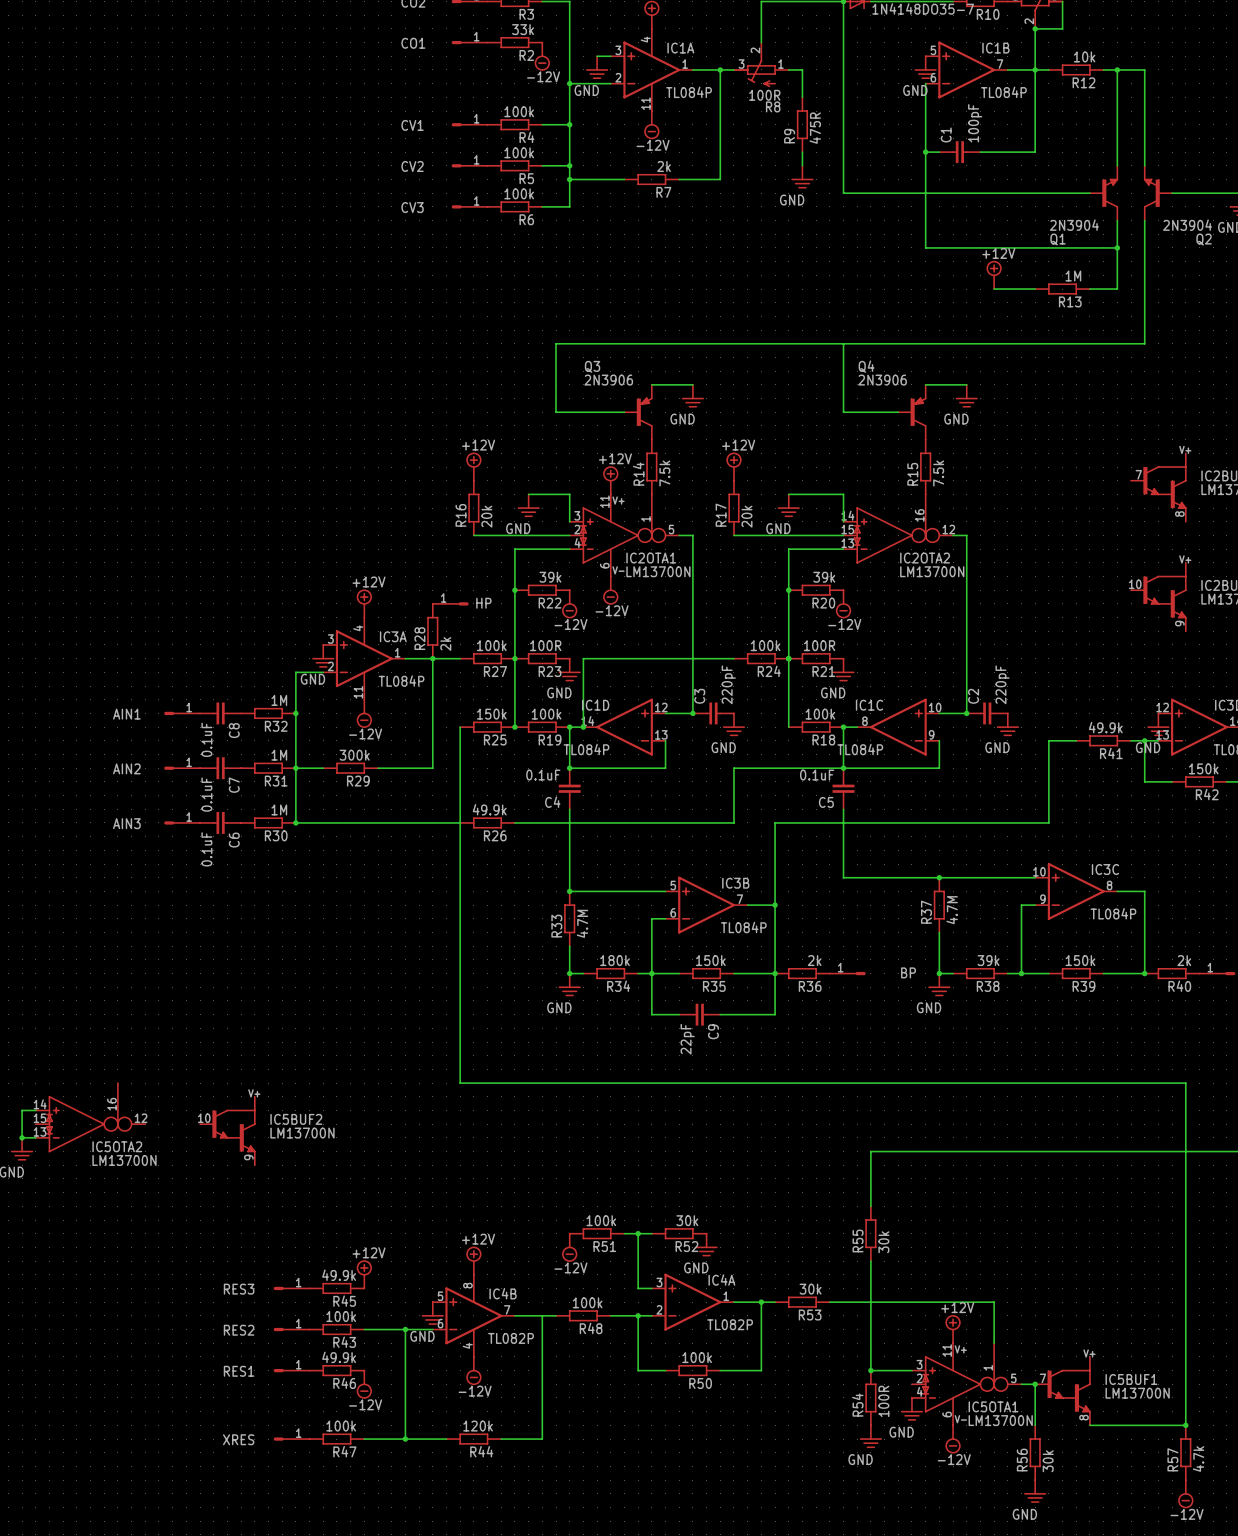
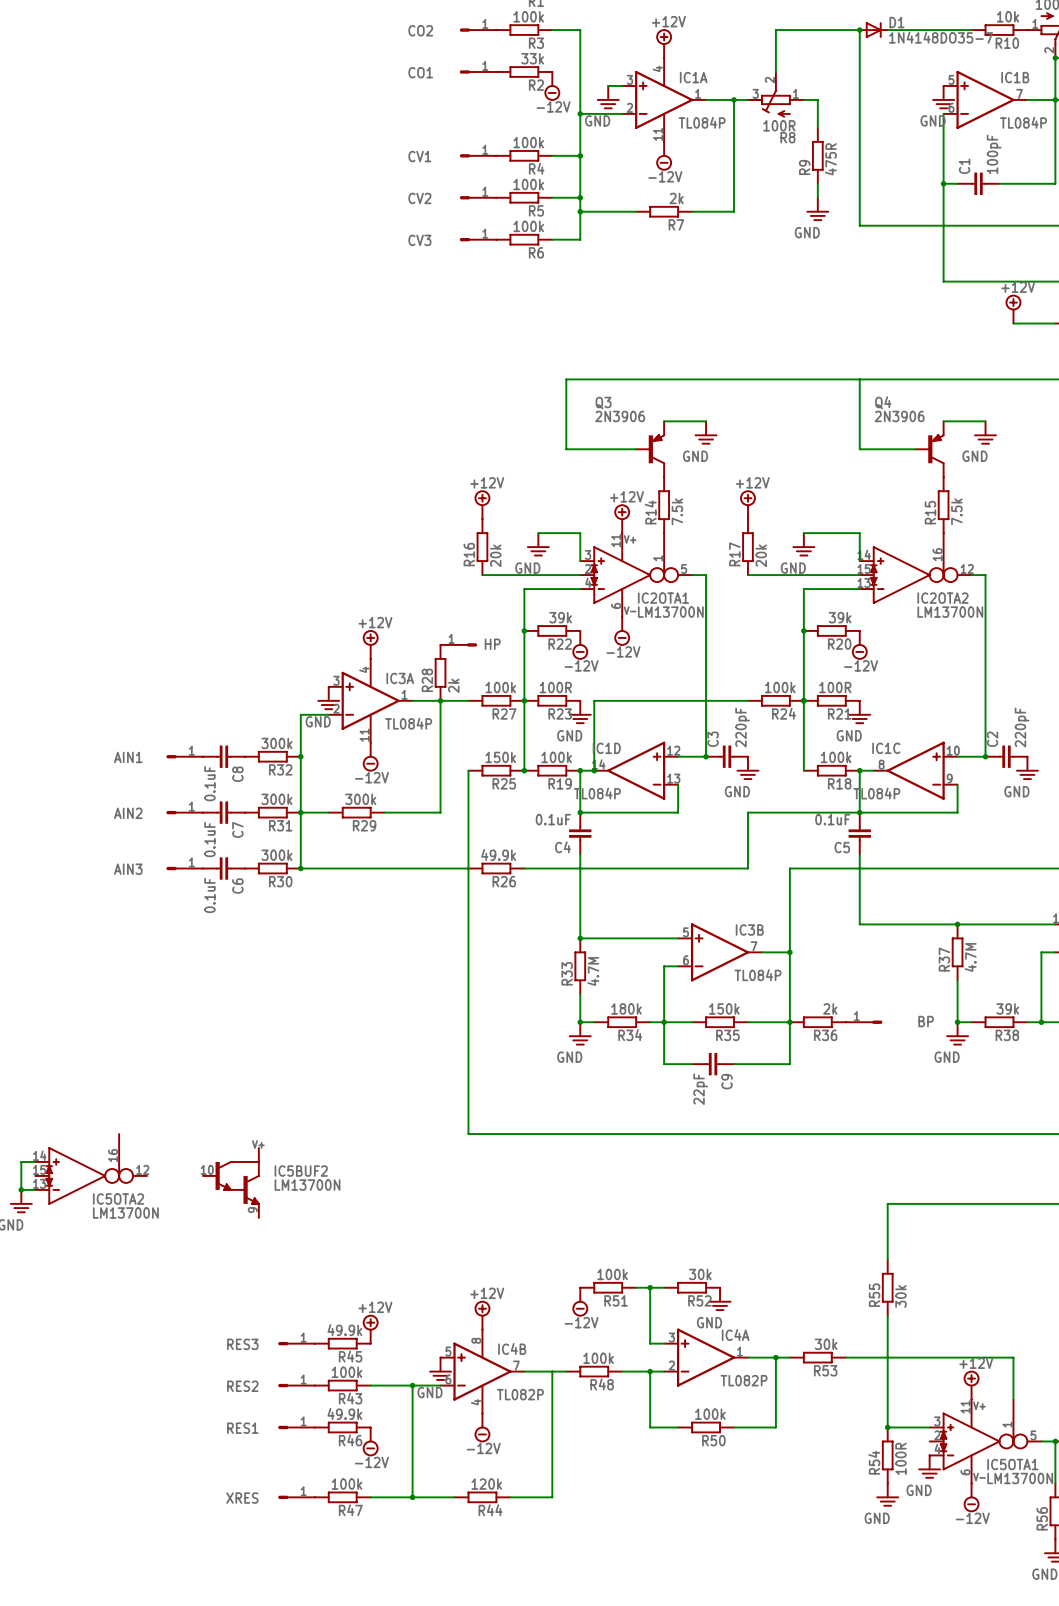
R32 value: 1M (279, 700) -> 300k (276, 743)
R31 value: 1M (279, 755) -> 300k (276, 799)
R30 value: 1M (279, 809) -> 300k (276, 855)

